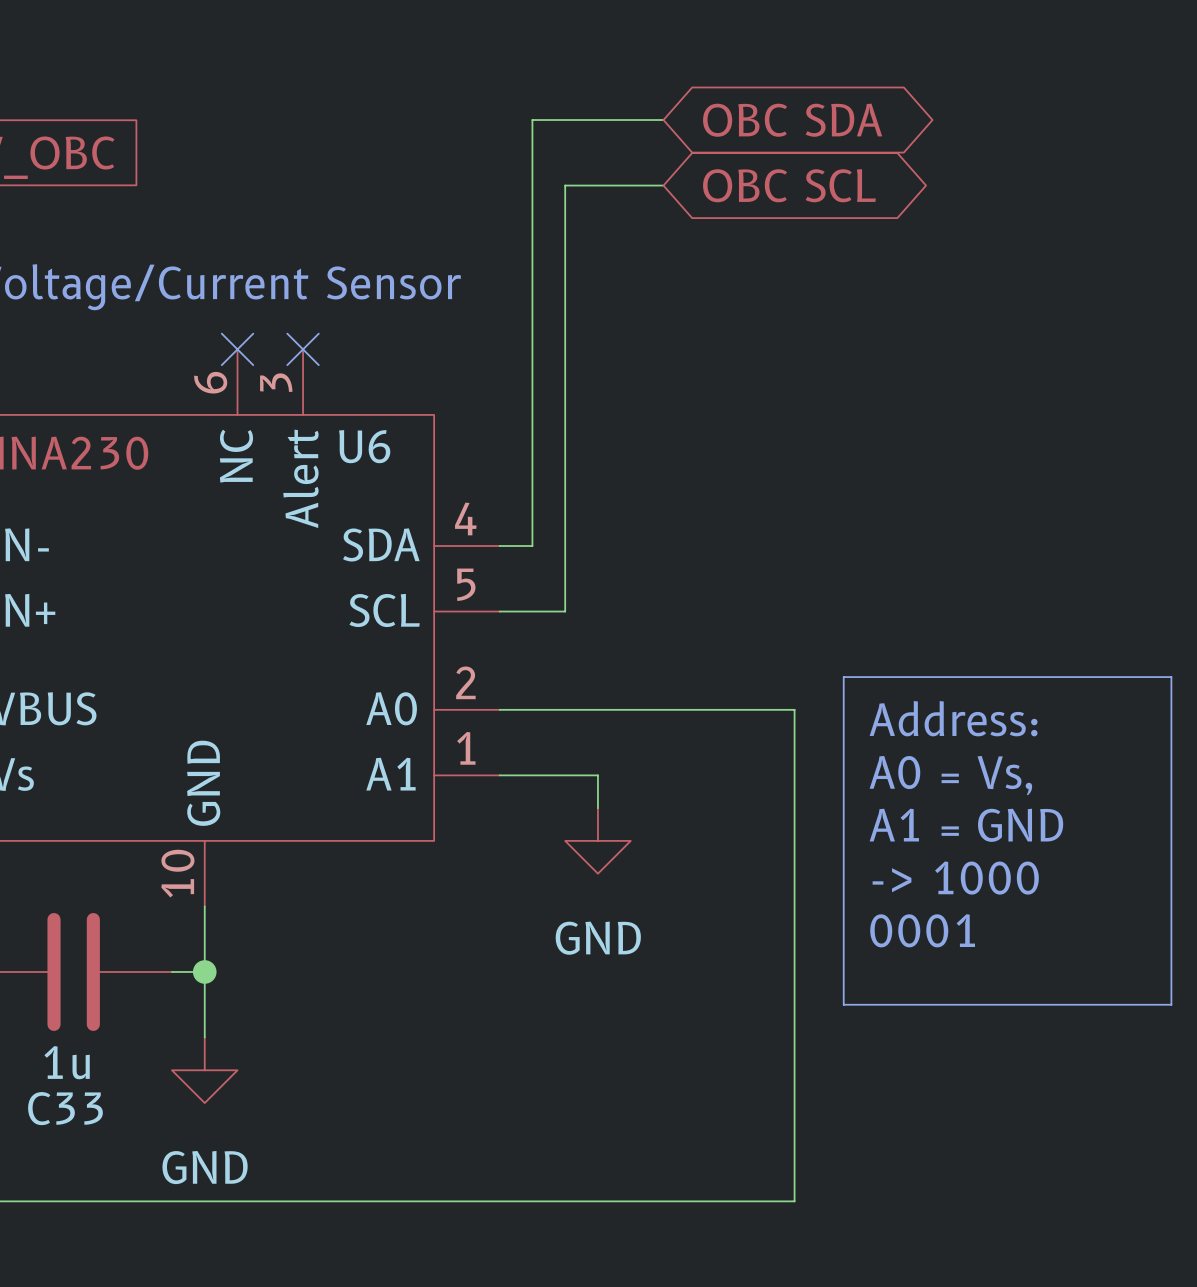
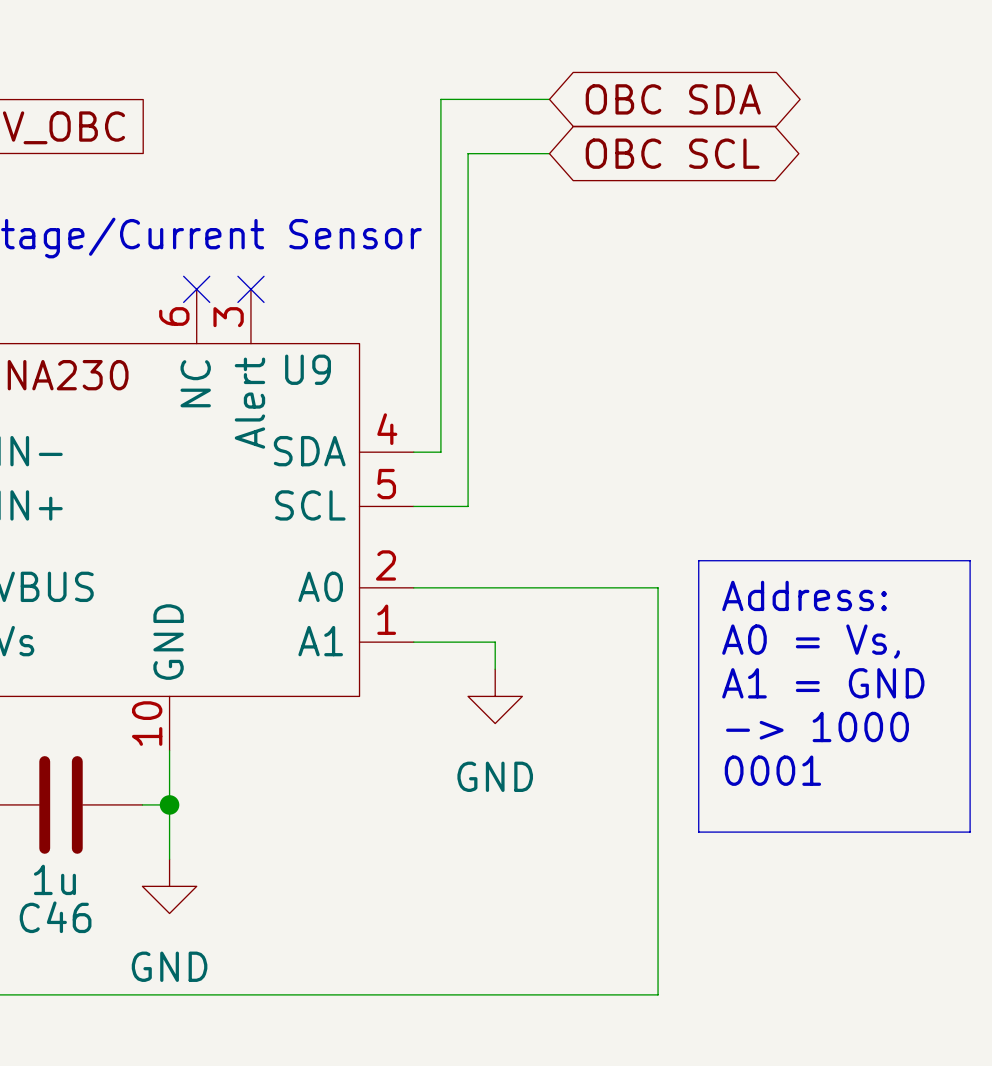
U6 name: U6 (364, 446) -> U9 (308, 369)
C33 name: C33 (65, 1108) -> C46 (55, 917)

